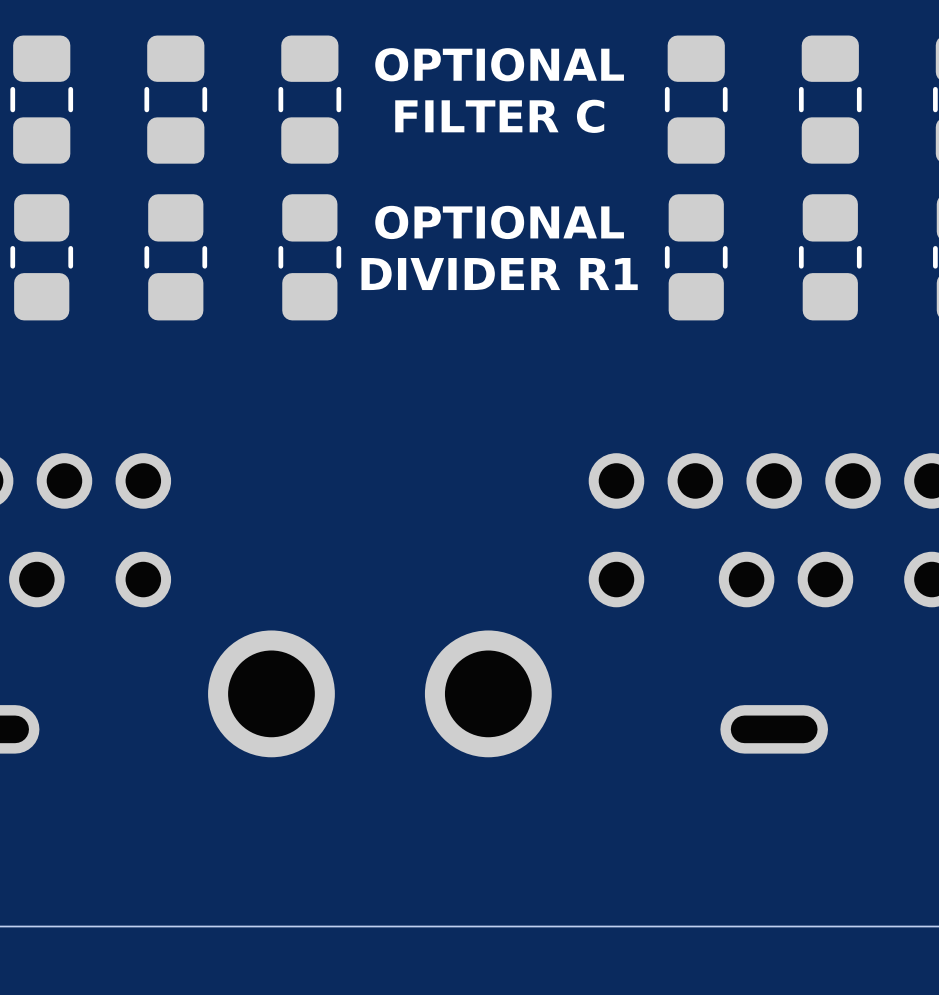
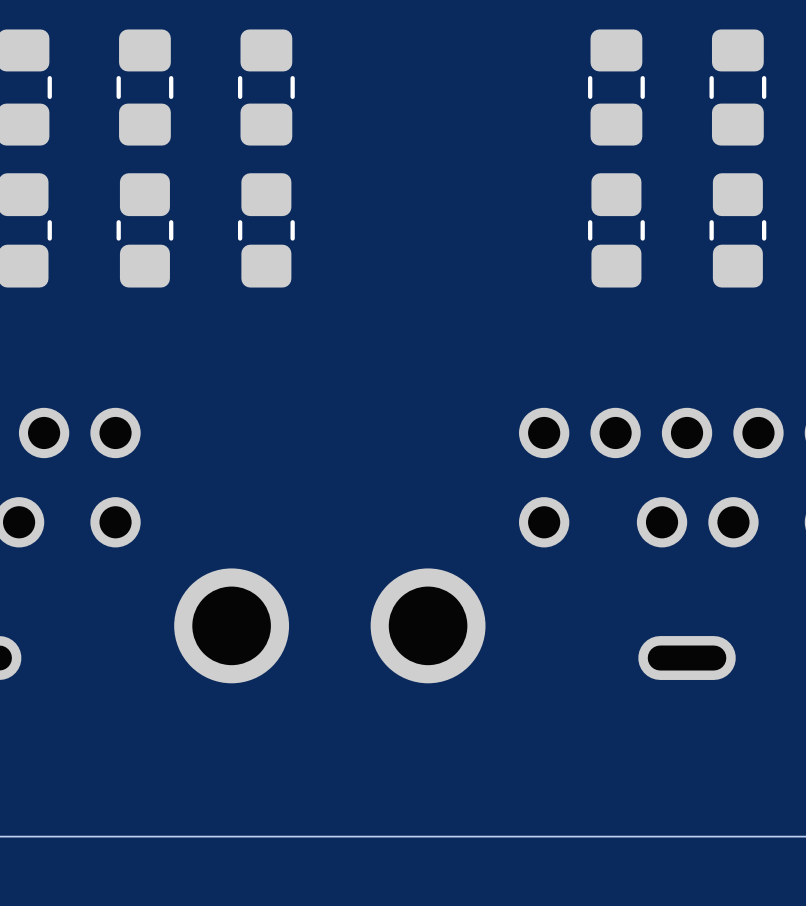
text: OPTIONAL (499, 64) -> none
text: FILTER C (499, 116) -> none
text: OPTIONAL (499, 222) -> none
text: DIVIDER R1 (499, 274) -> none

